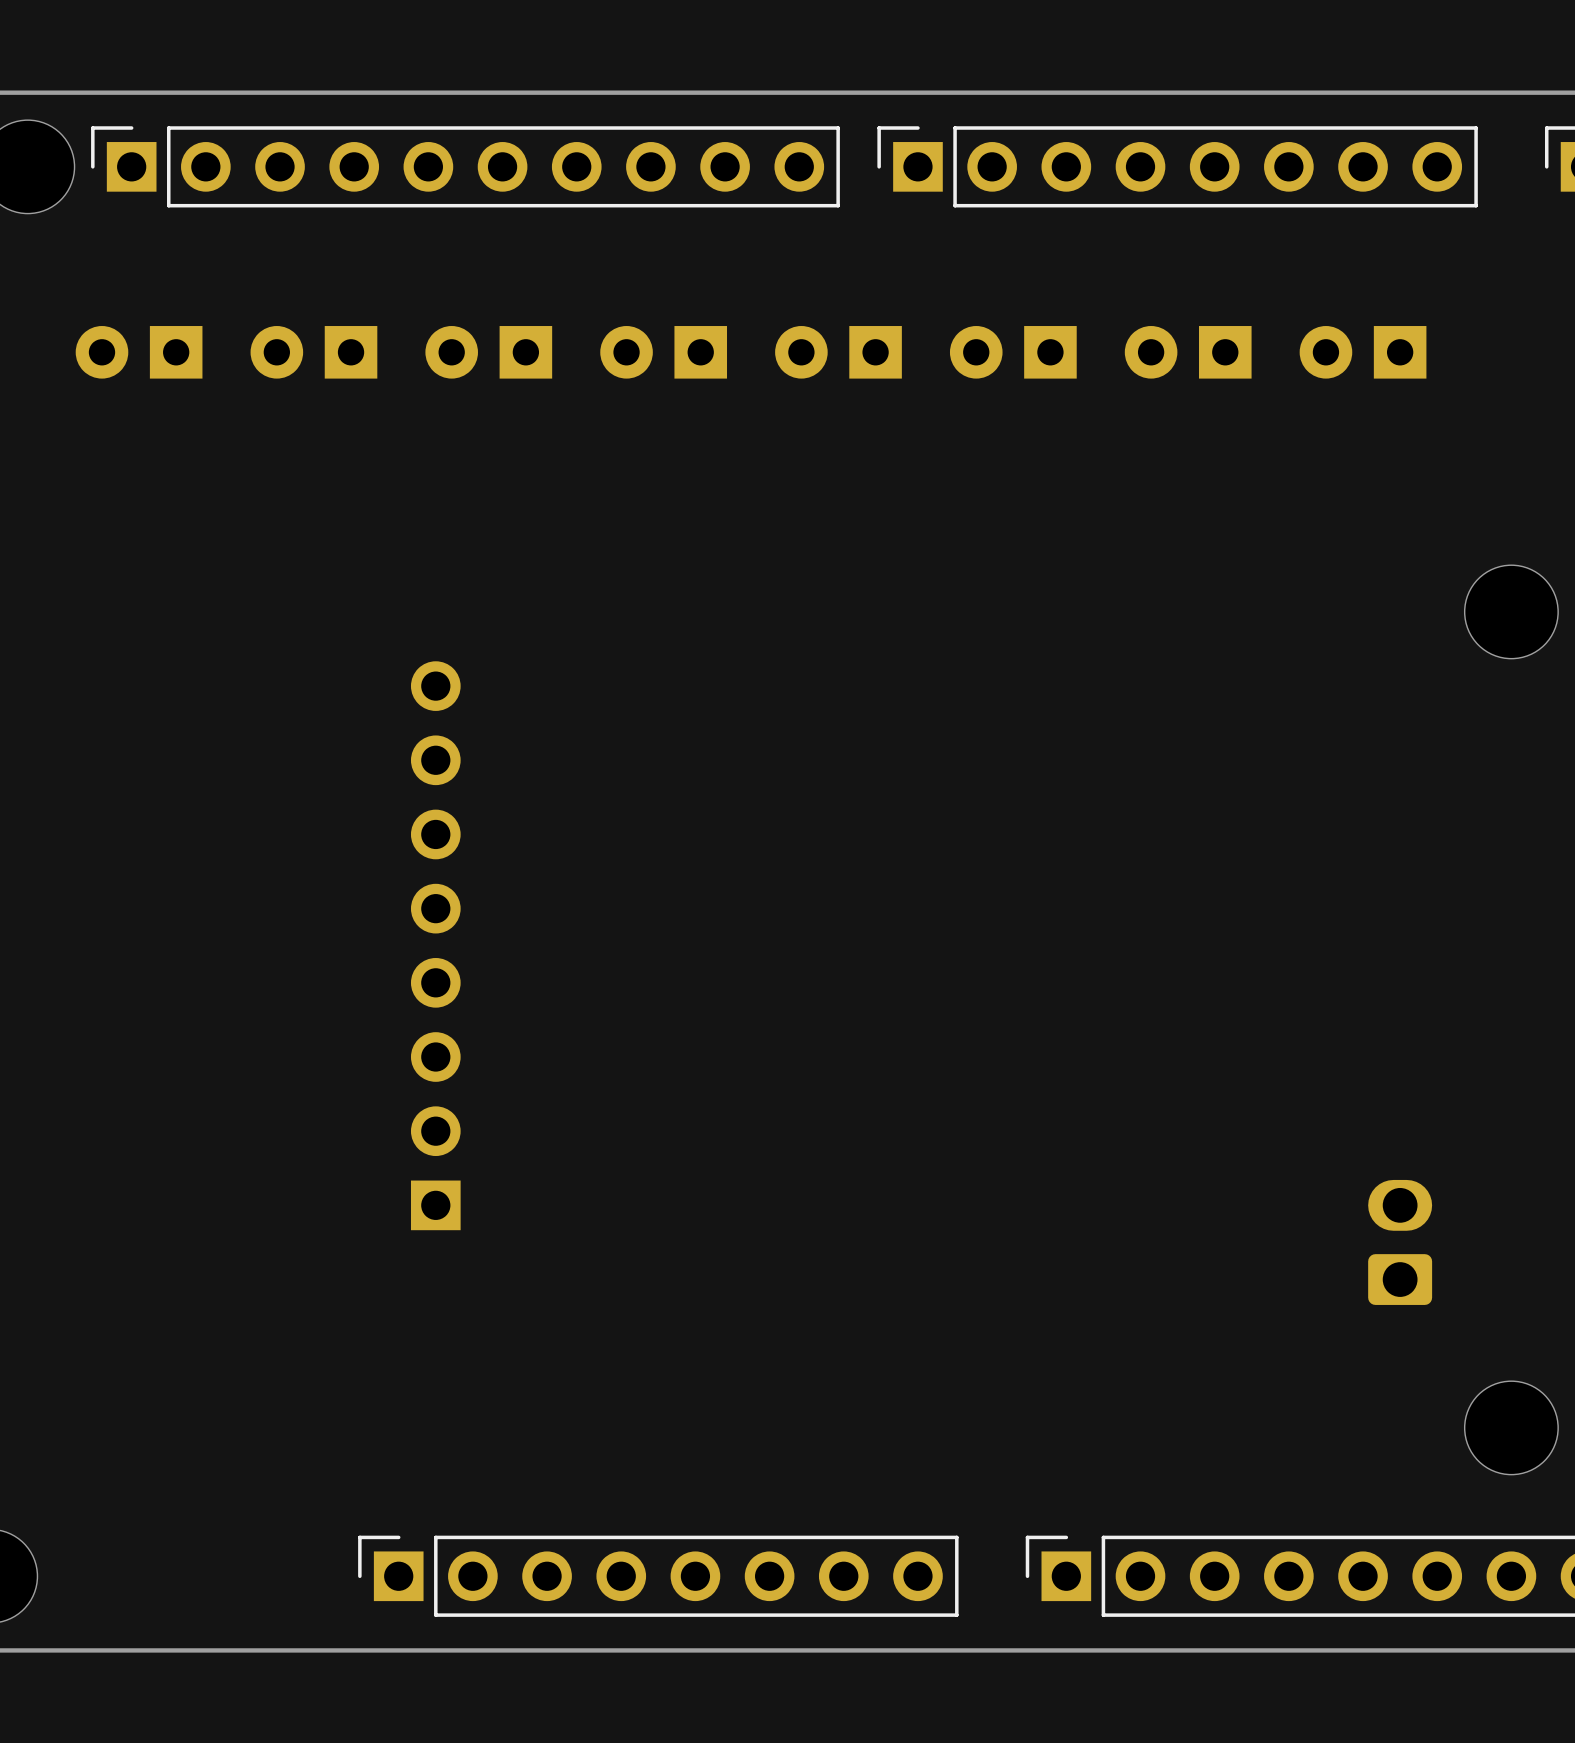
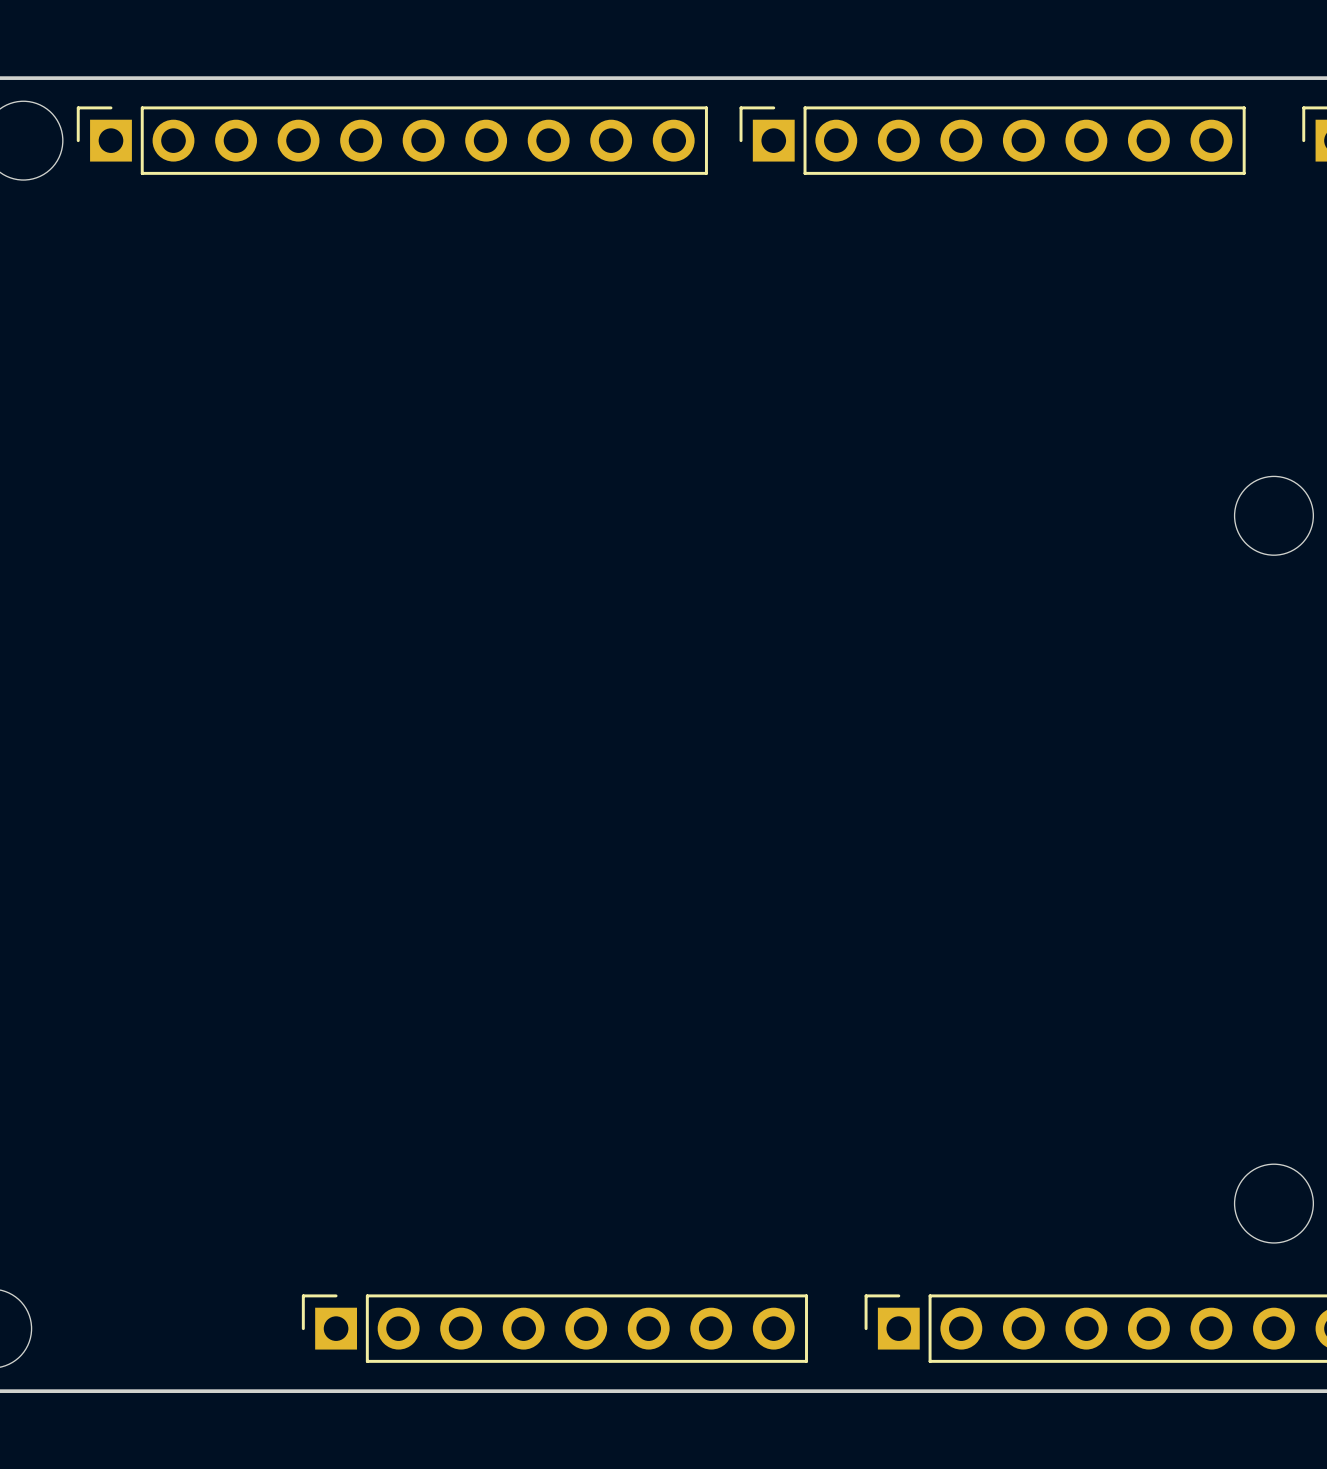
part: (139, 352) -> none
part: (313, 352) -> none
part: (488, 352) -> none
part: (663, 352) -> none
part: (838, 352) -> none
part: (1013, 352) -> none
part: (1188, 352) -> none
part: (1363, 352) -> none
part: (435, 945) -> none
part: (1400, 1242) -> none

